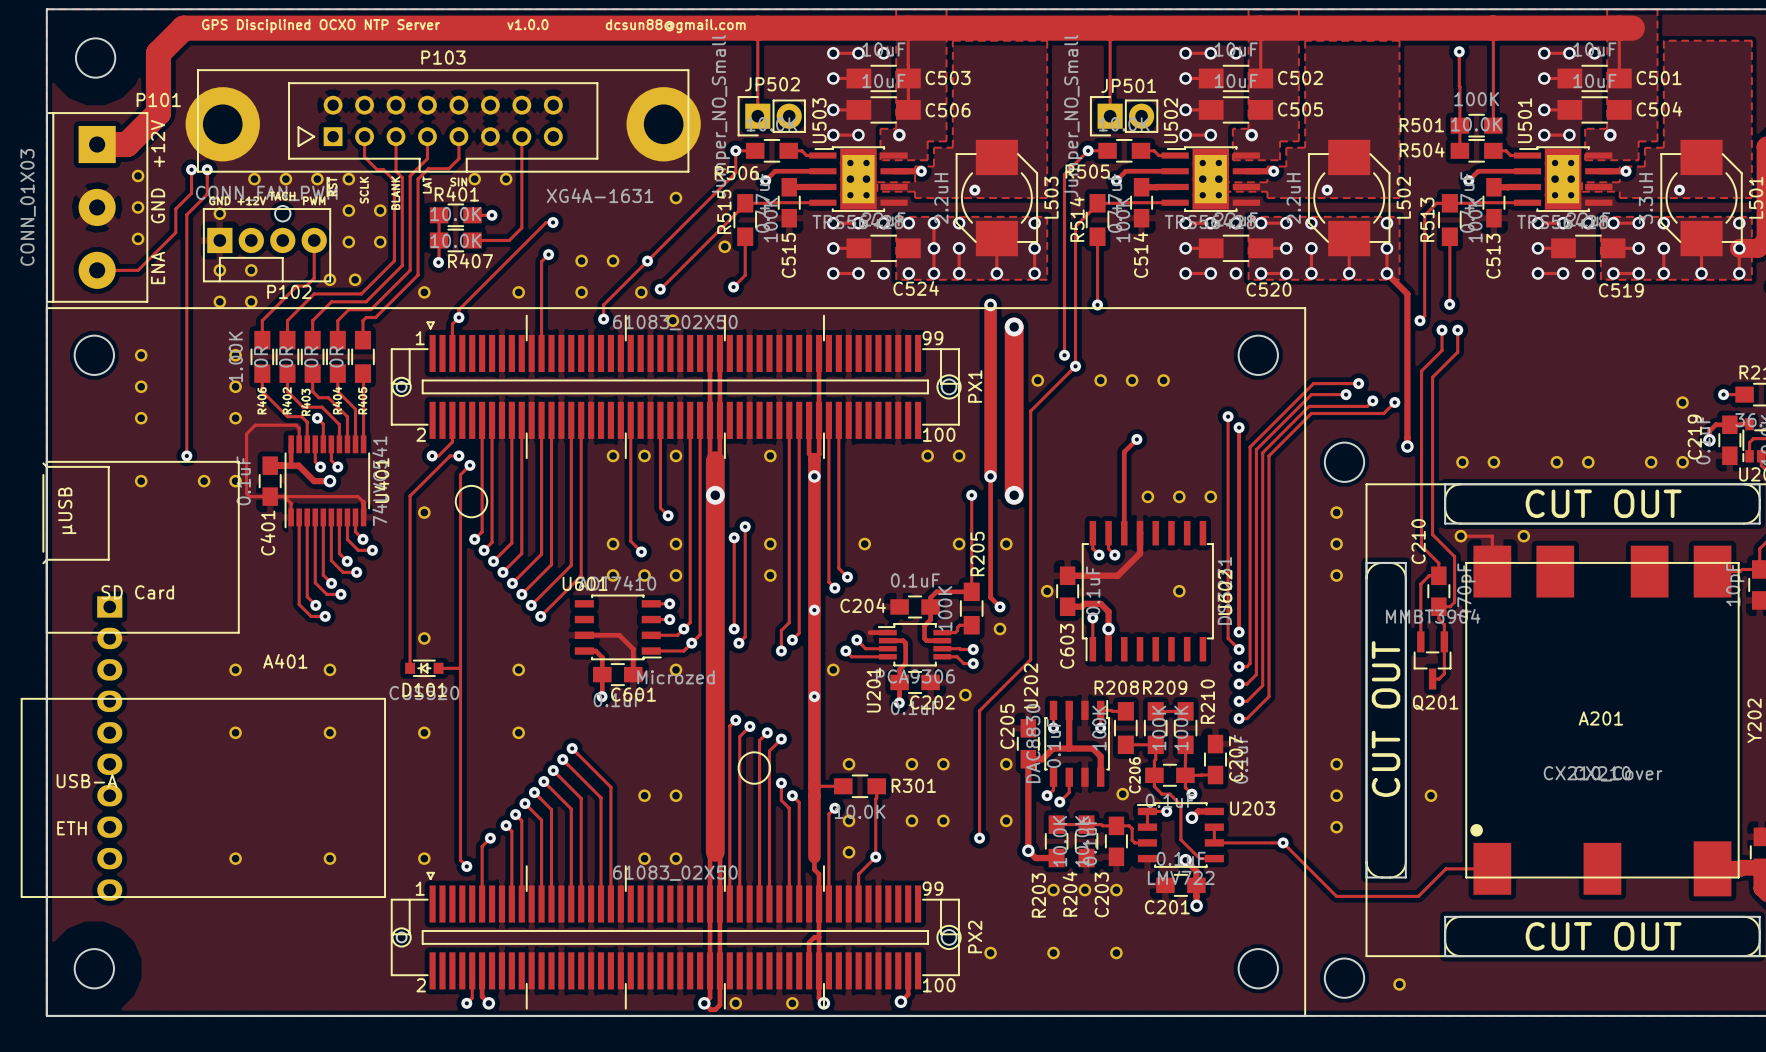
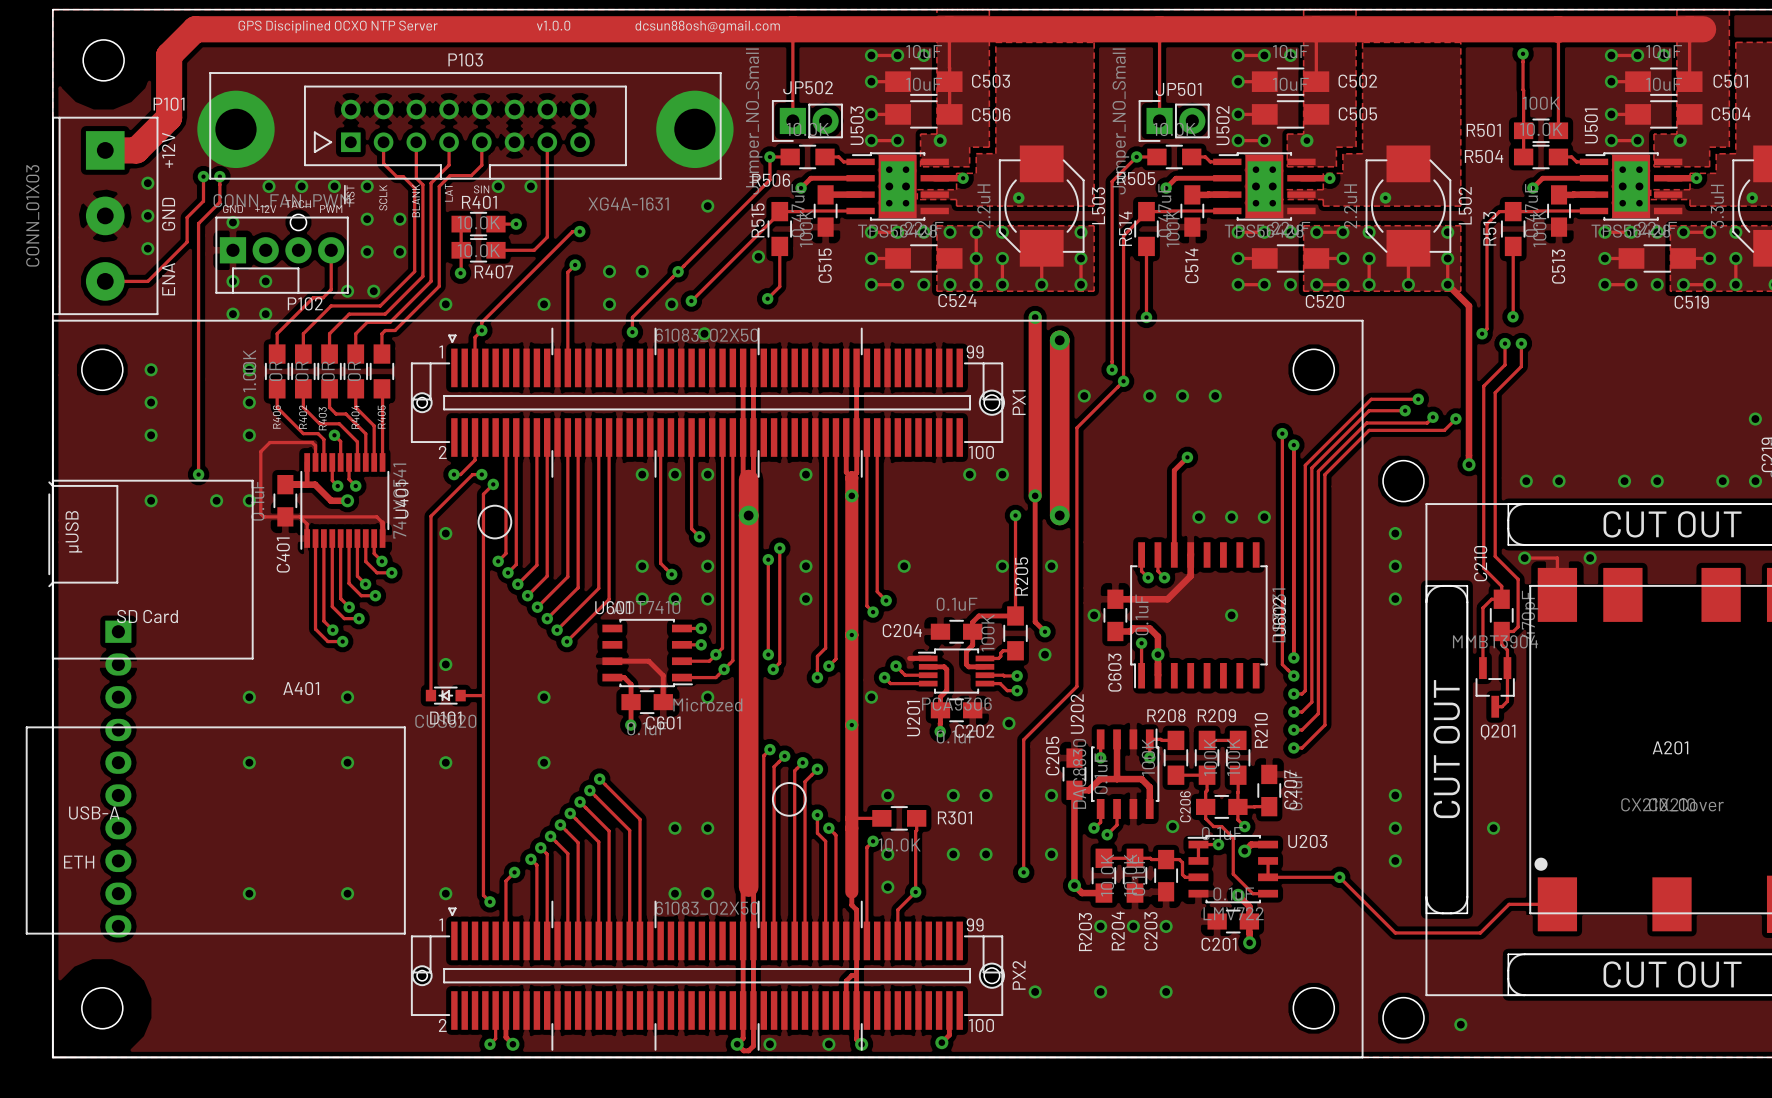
text: dcsun88@gmail.com (675, 26) -> dcsun88osh@gmail.com (707, 26)

